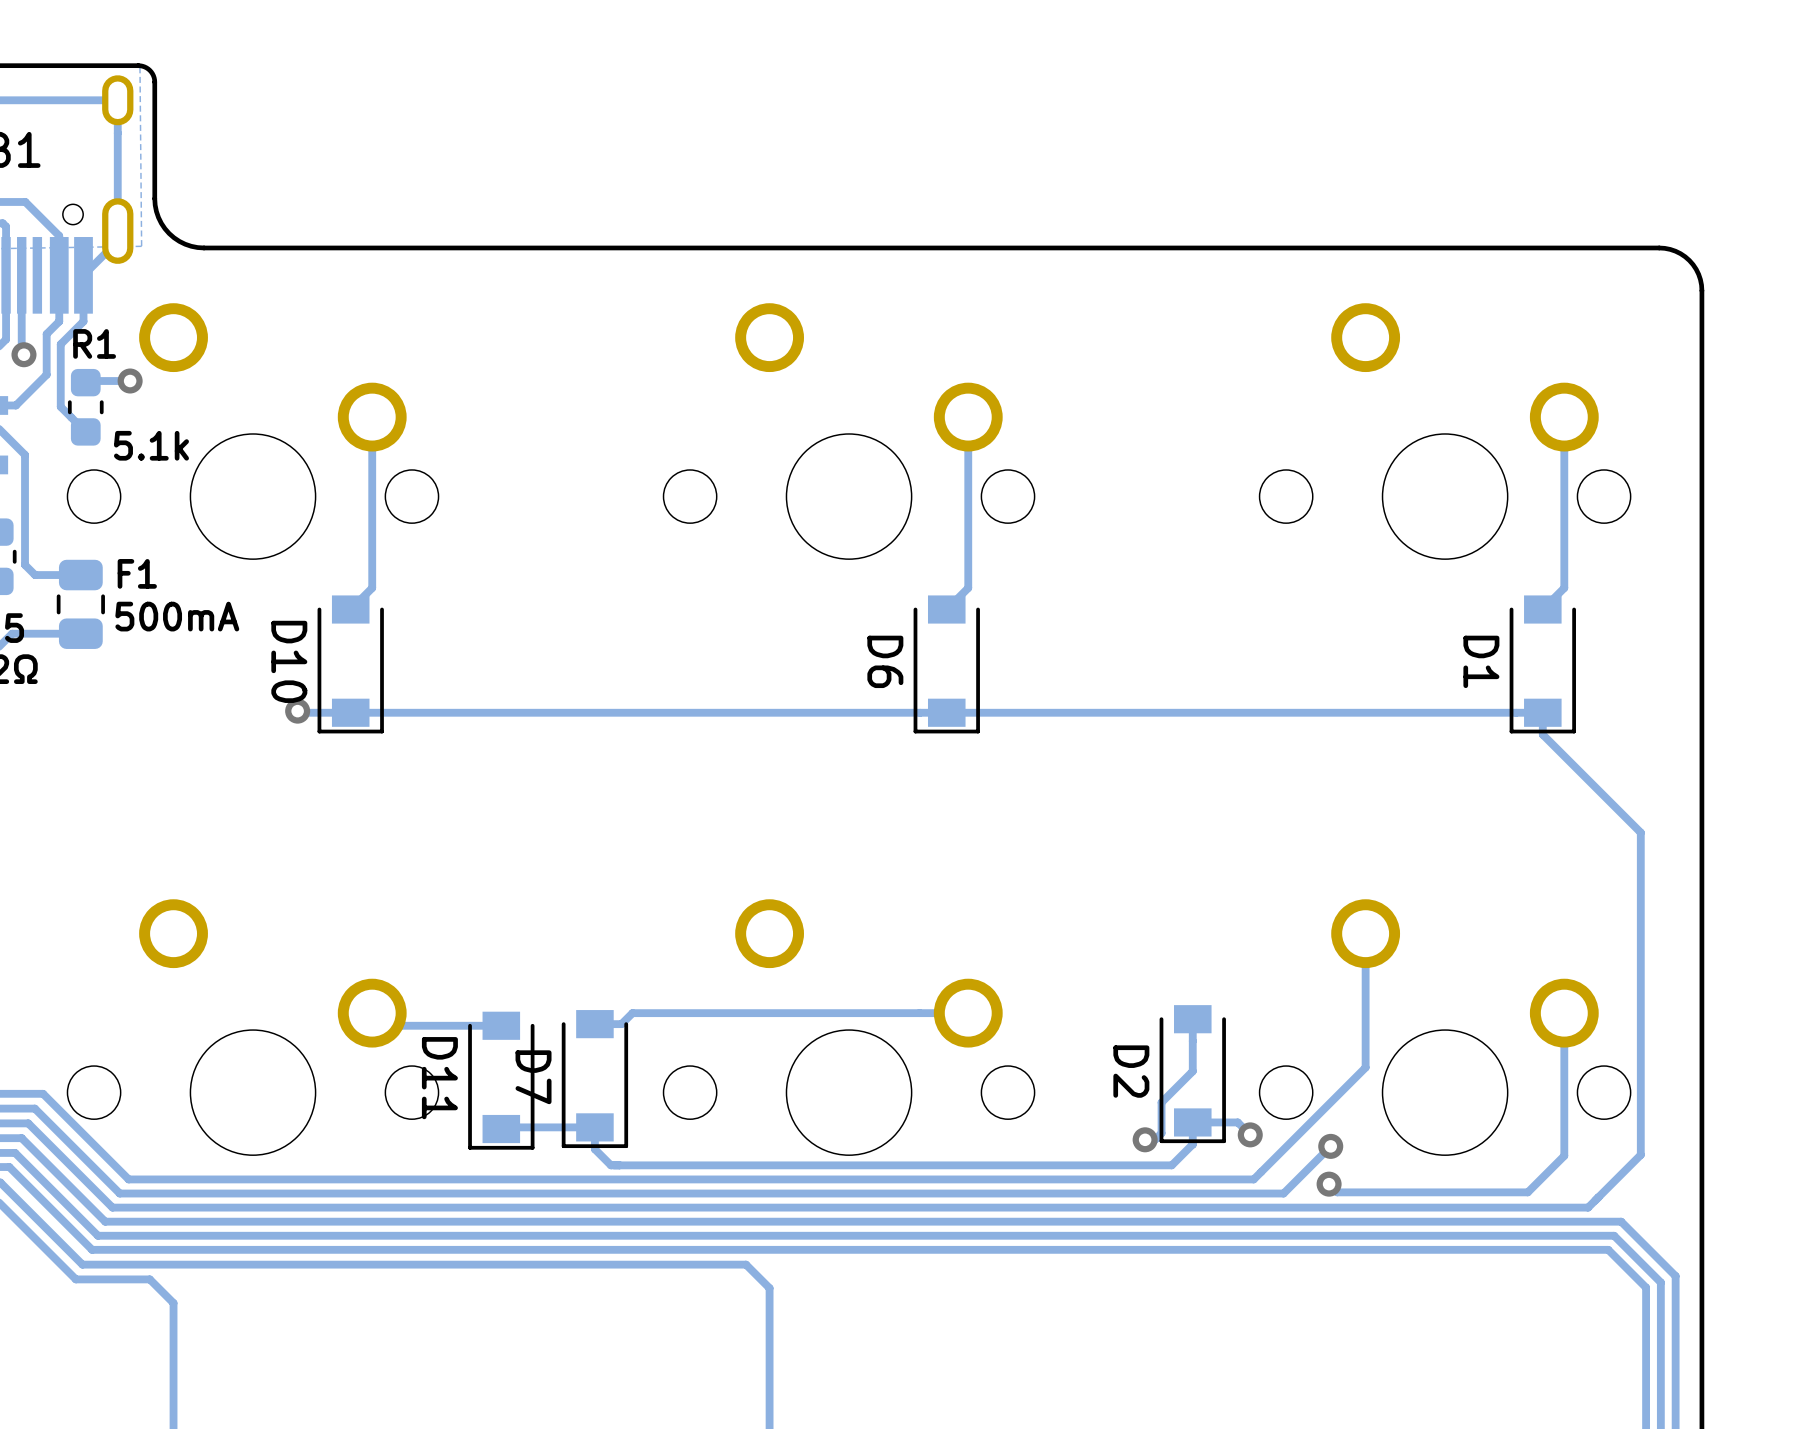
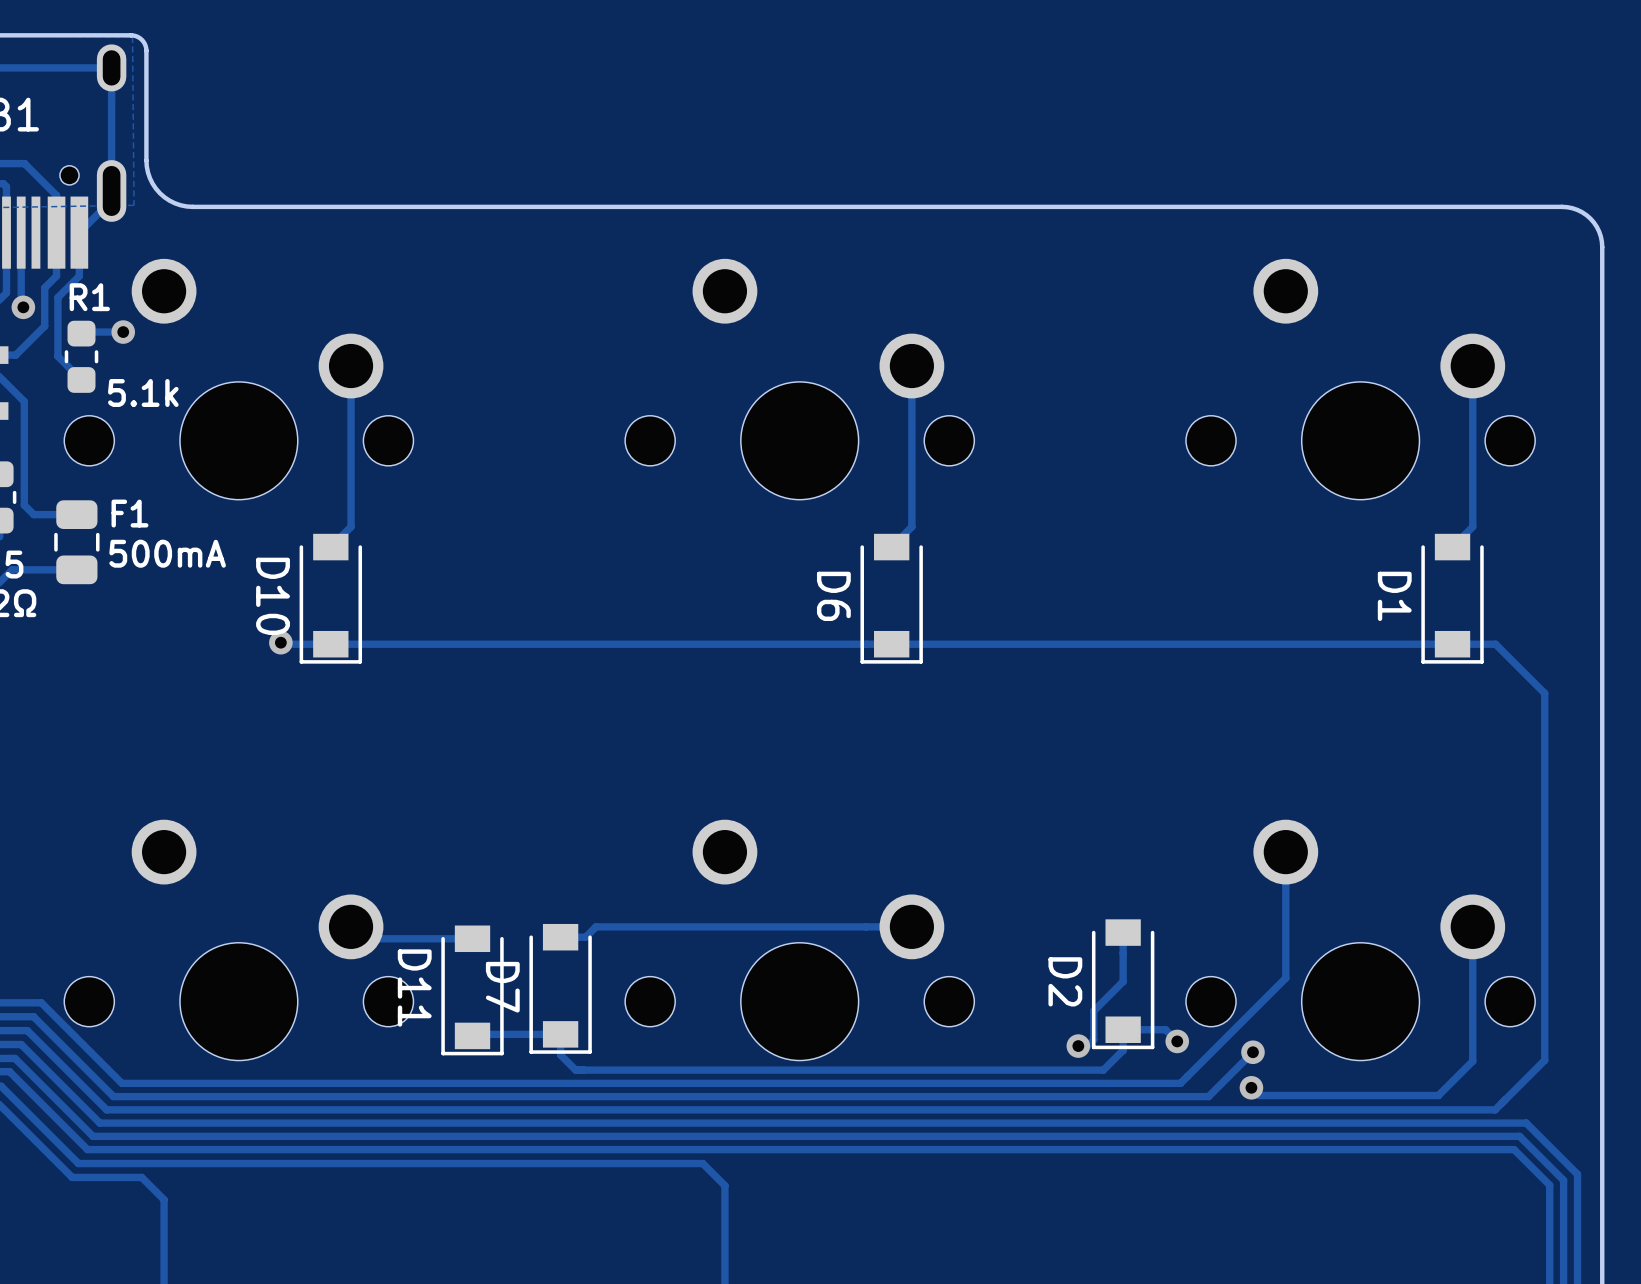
track: (1542, 712) (1542, 734) (1640, 832) -> (1452, 644) (1495, 644) (1544, 693) (1544, 757)

